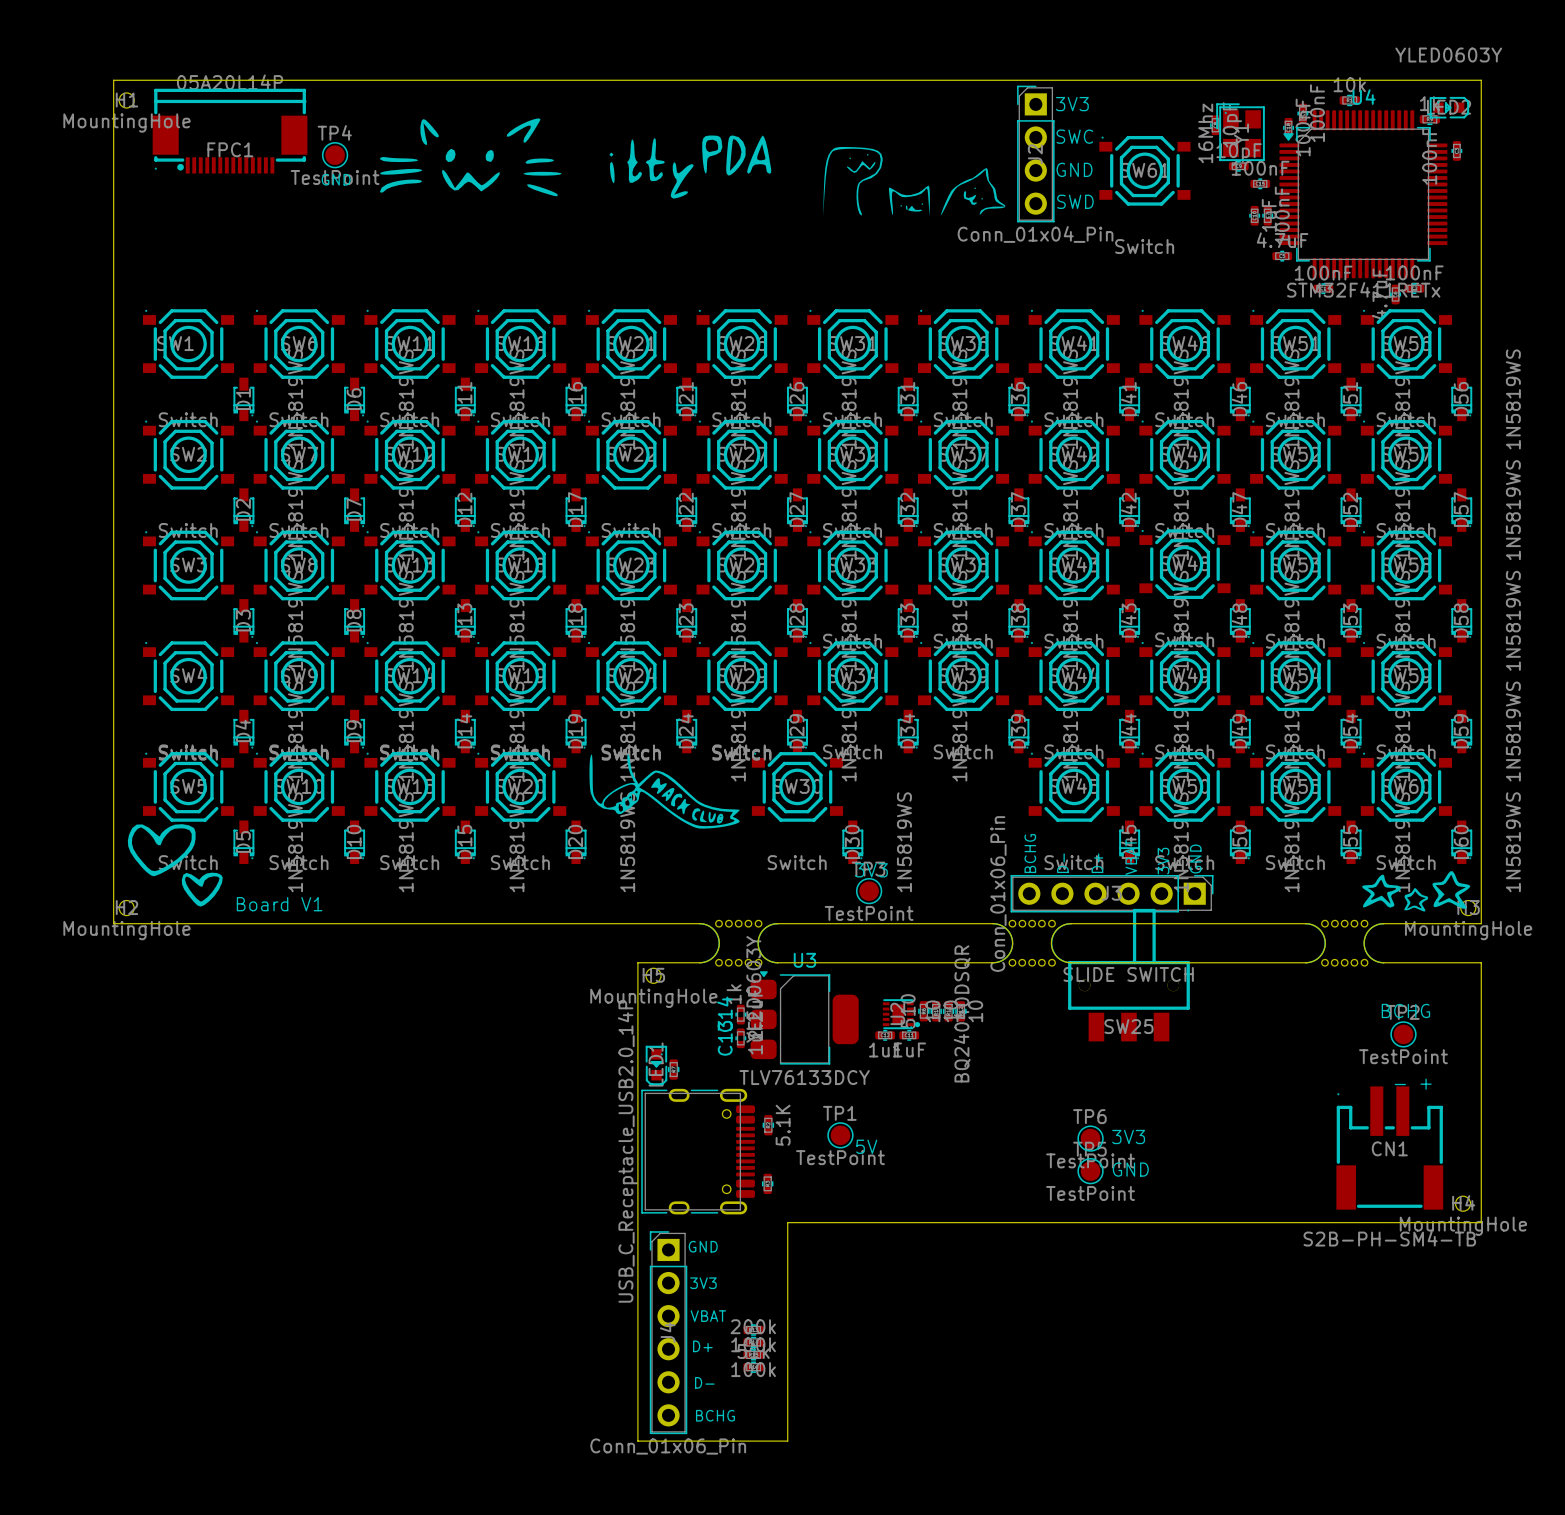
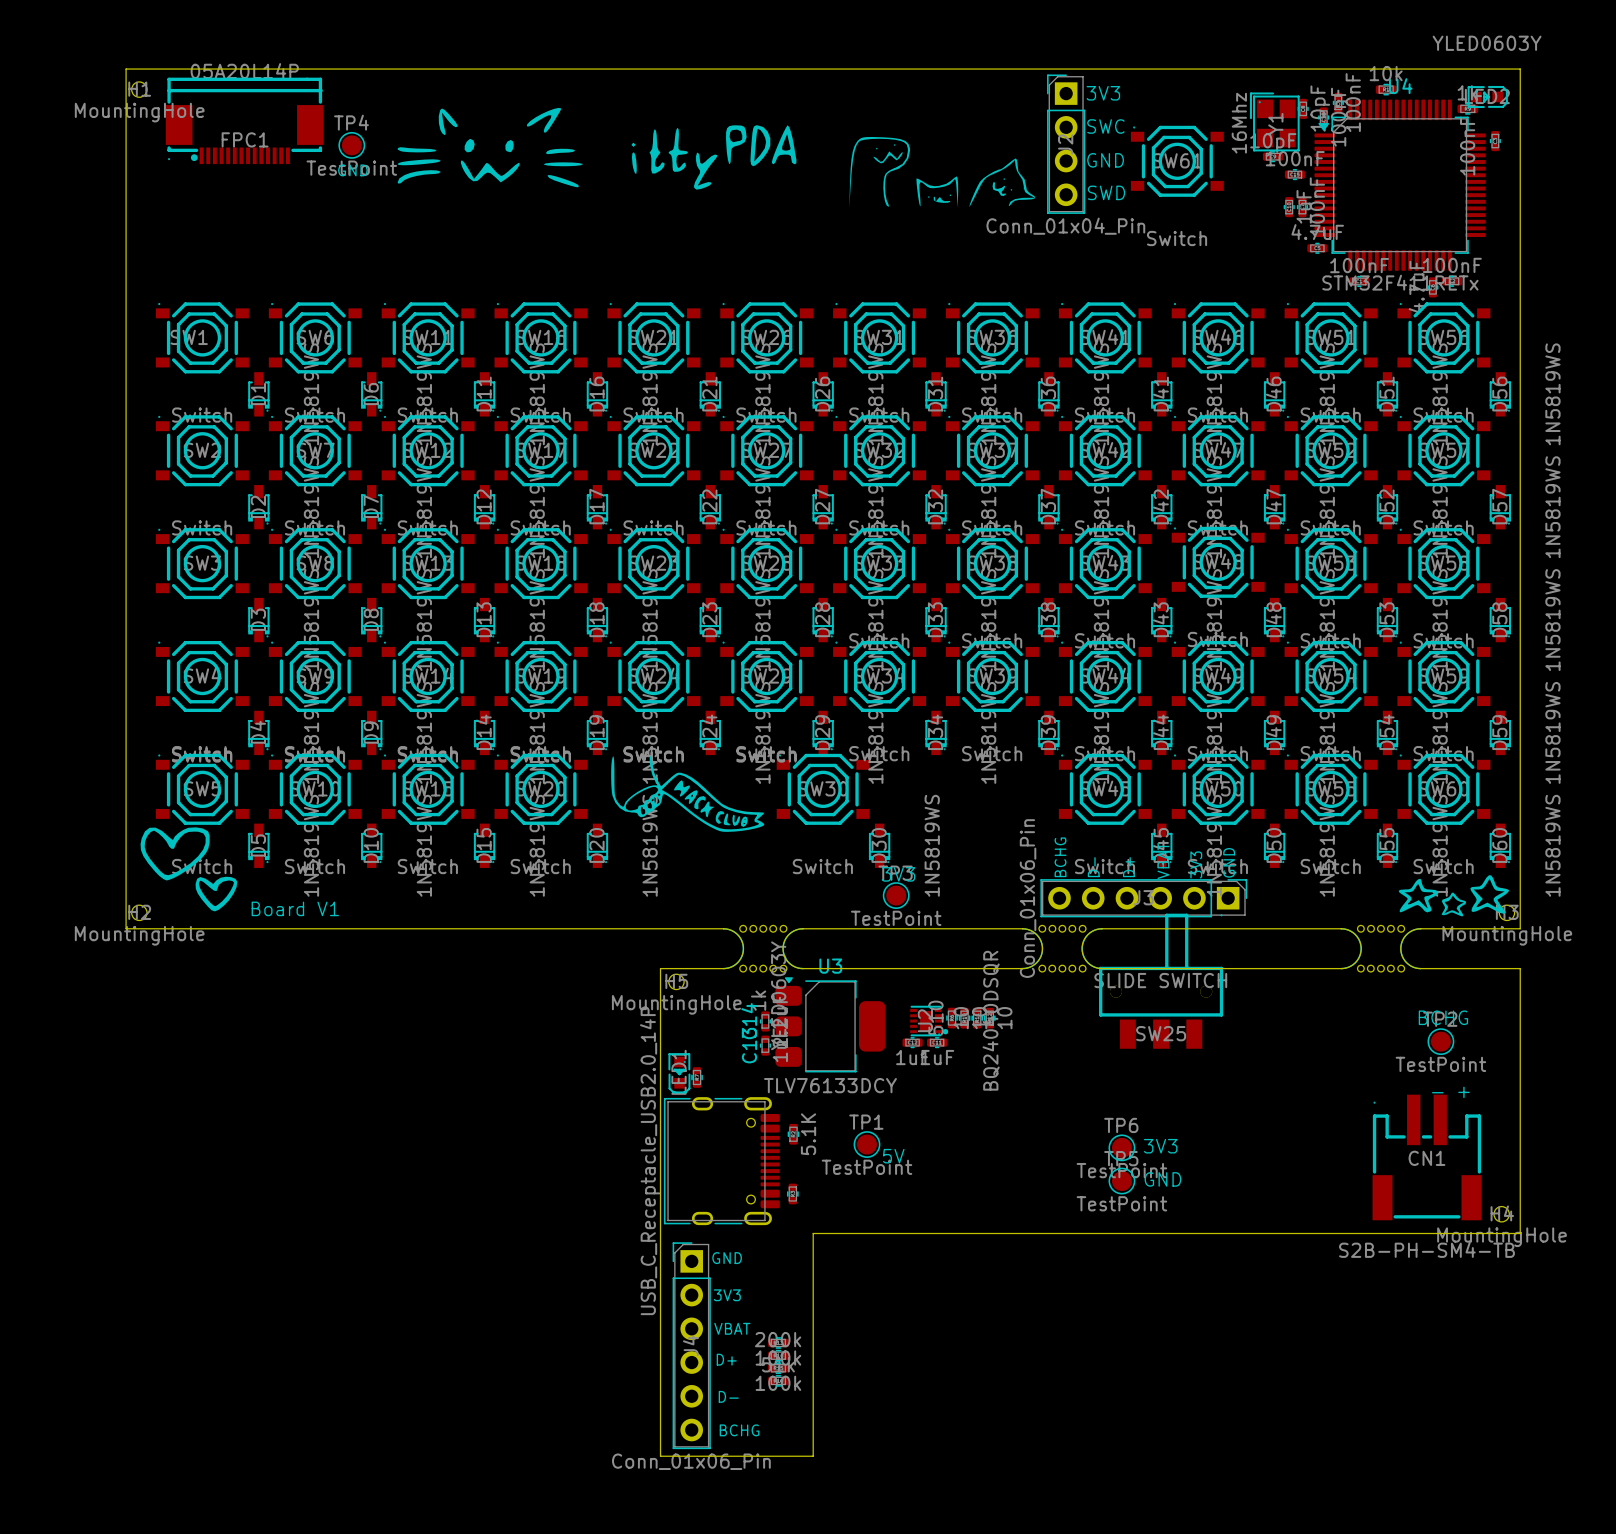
part position: (1215, 125) -> (1303, 108)

